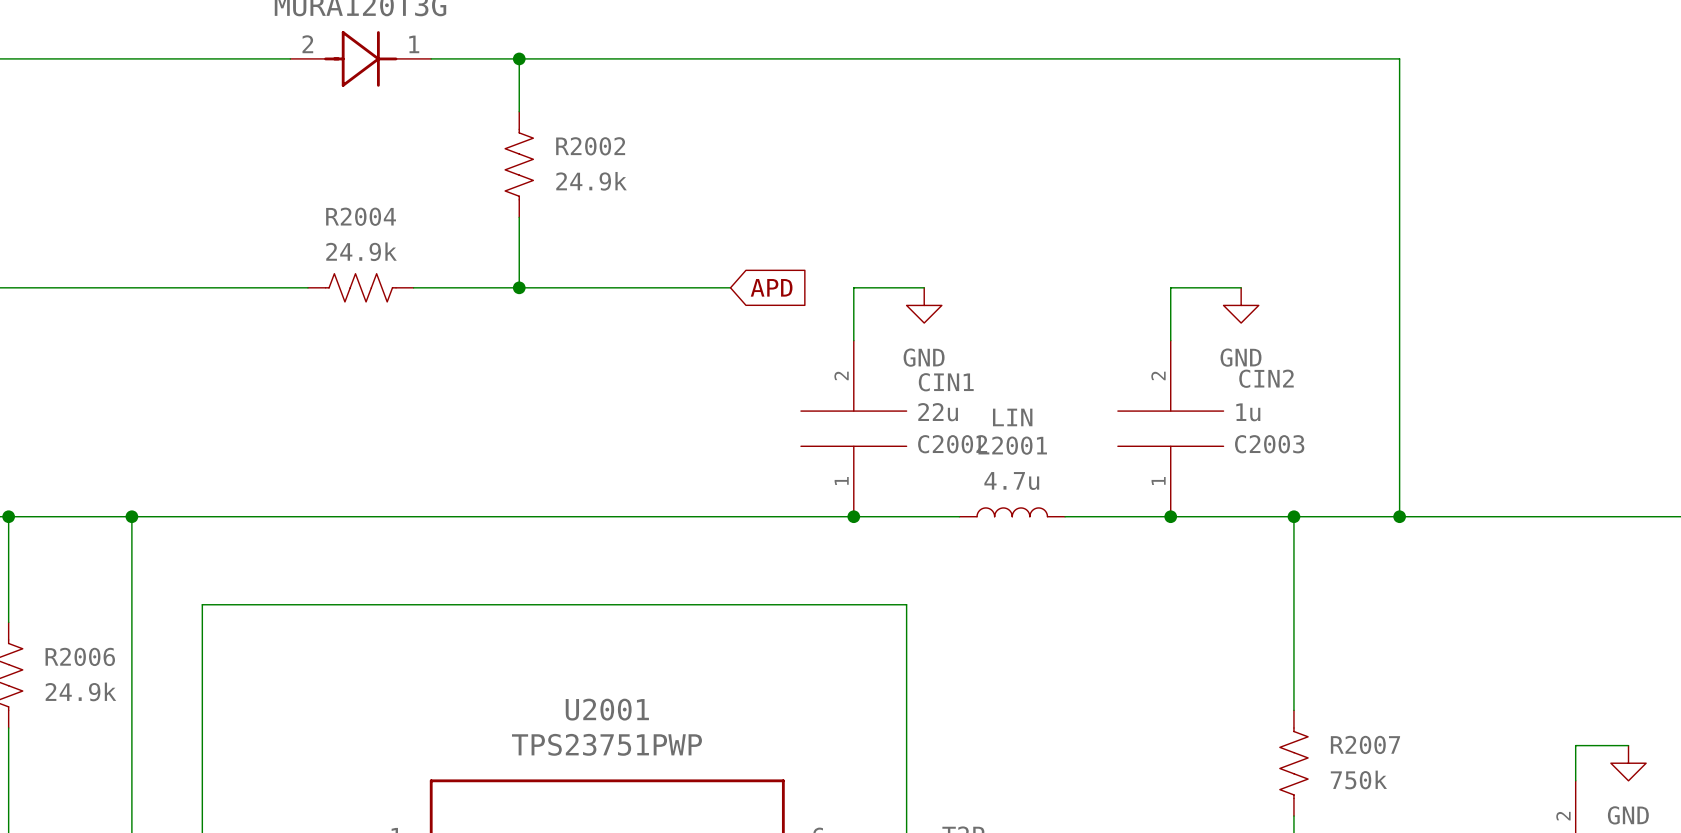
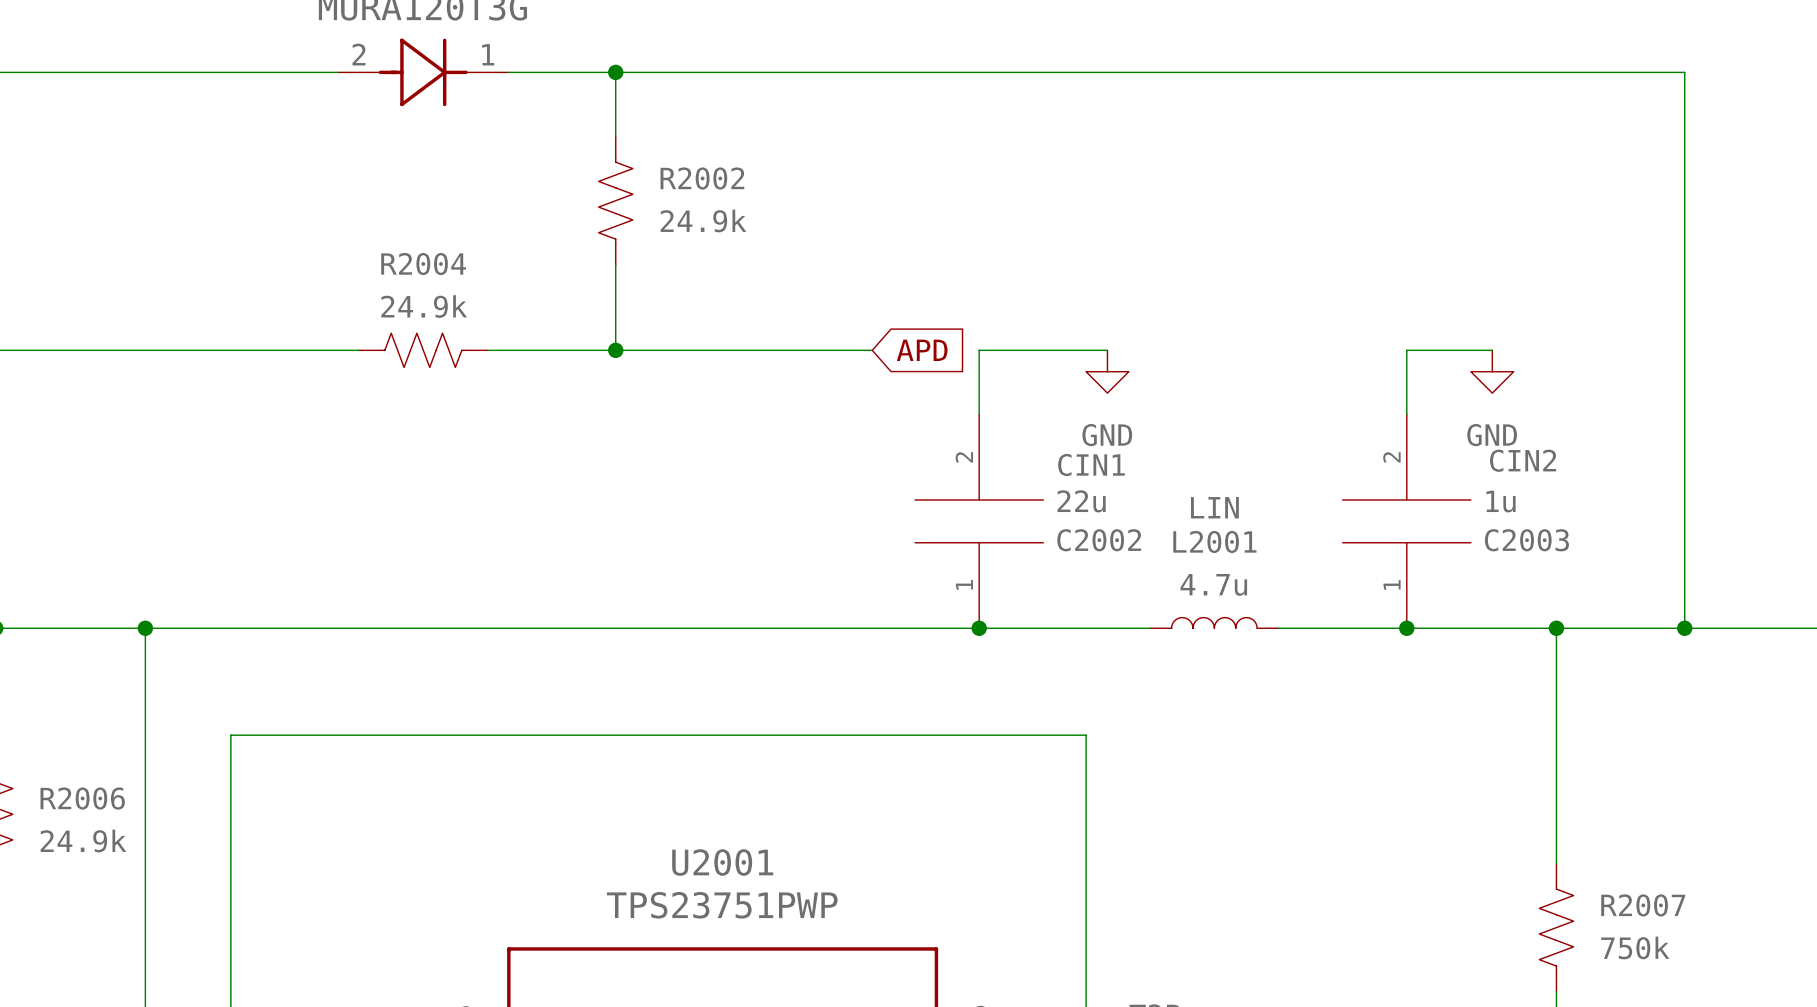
wire: (853, 287) (853, 340) -> (1021, 350) (979, 350) (979, 414)
C2002 position: (853, 428) -> (979, 521)
junction position: (853, 516) -> (979, 628)

